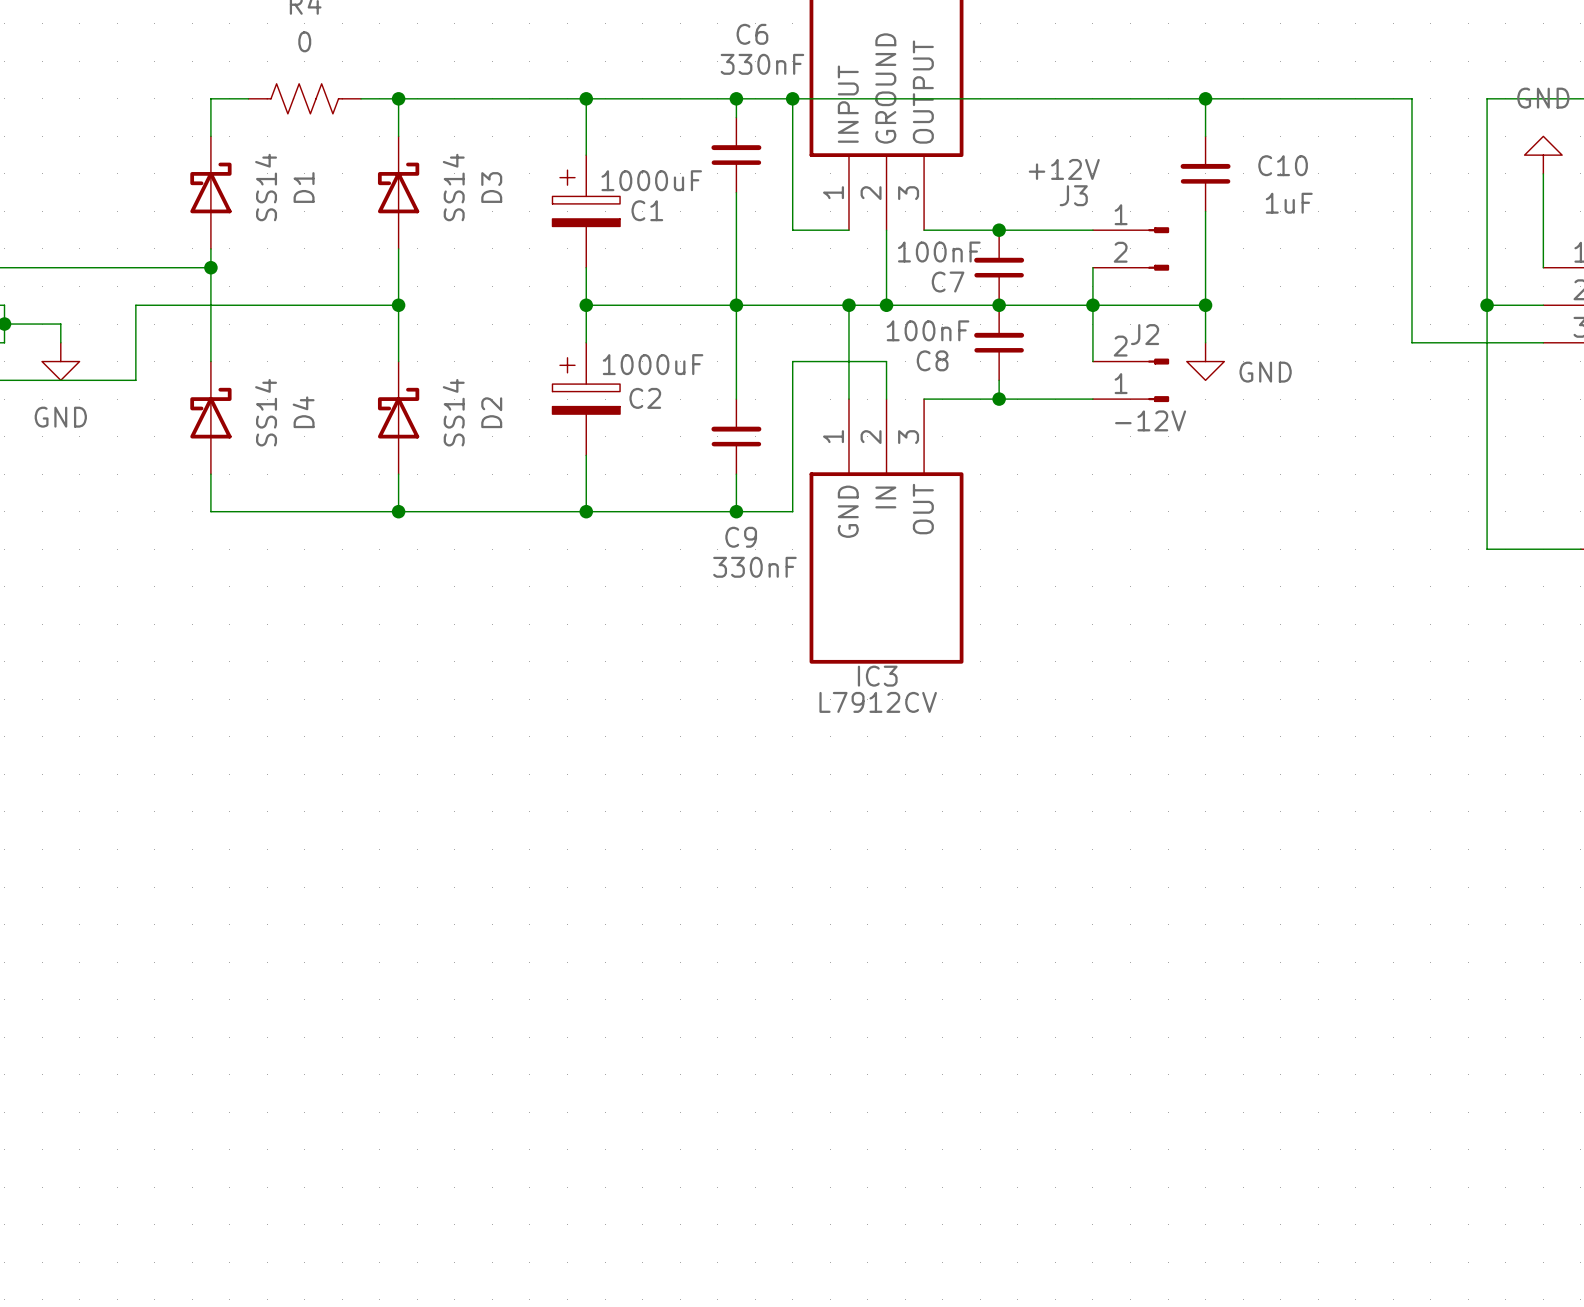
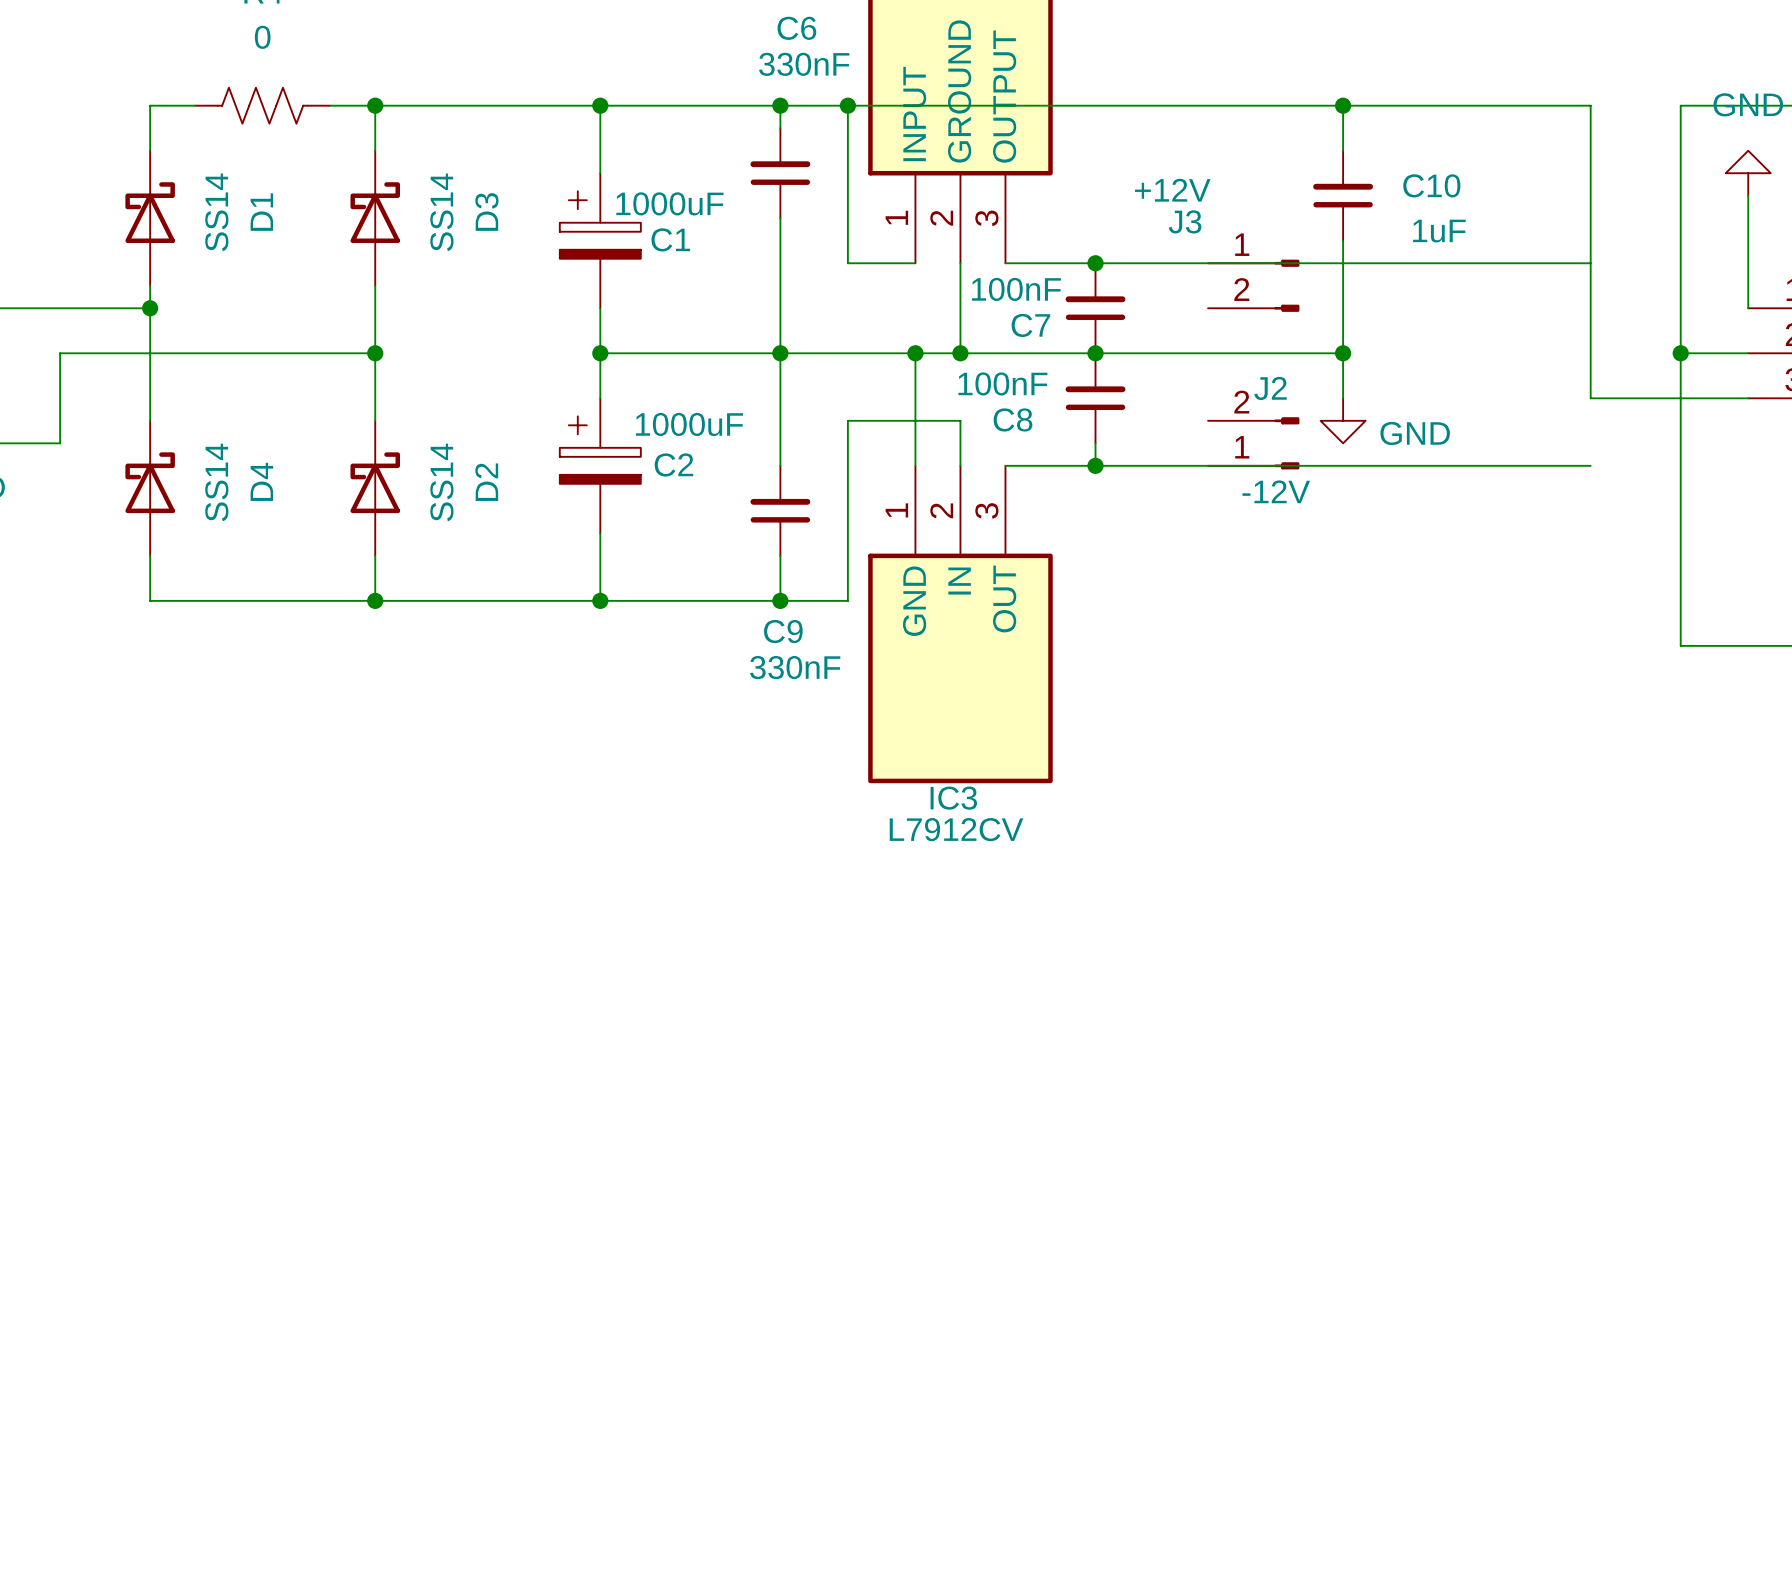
wire: none -> (1208, 263) (1590, 263)
wire: (1092, 267) (1092, 361) -> none
junction: (1092, 305) -> none
wire: none -> (1208, 465) (1590, 465)

